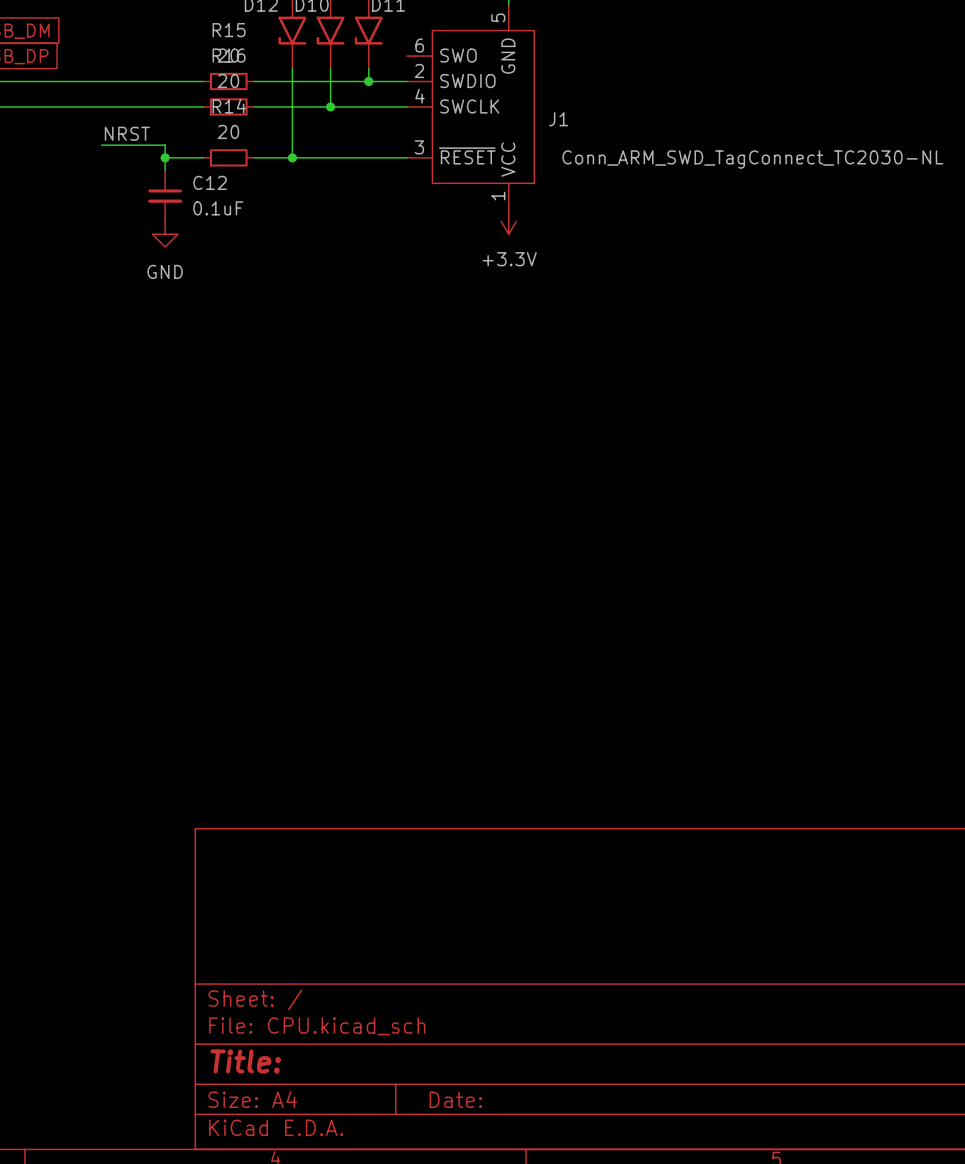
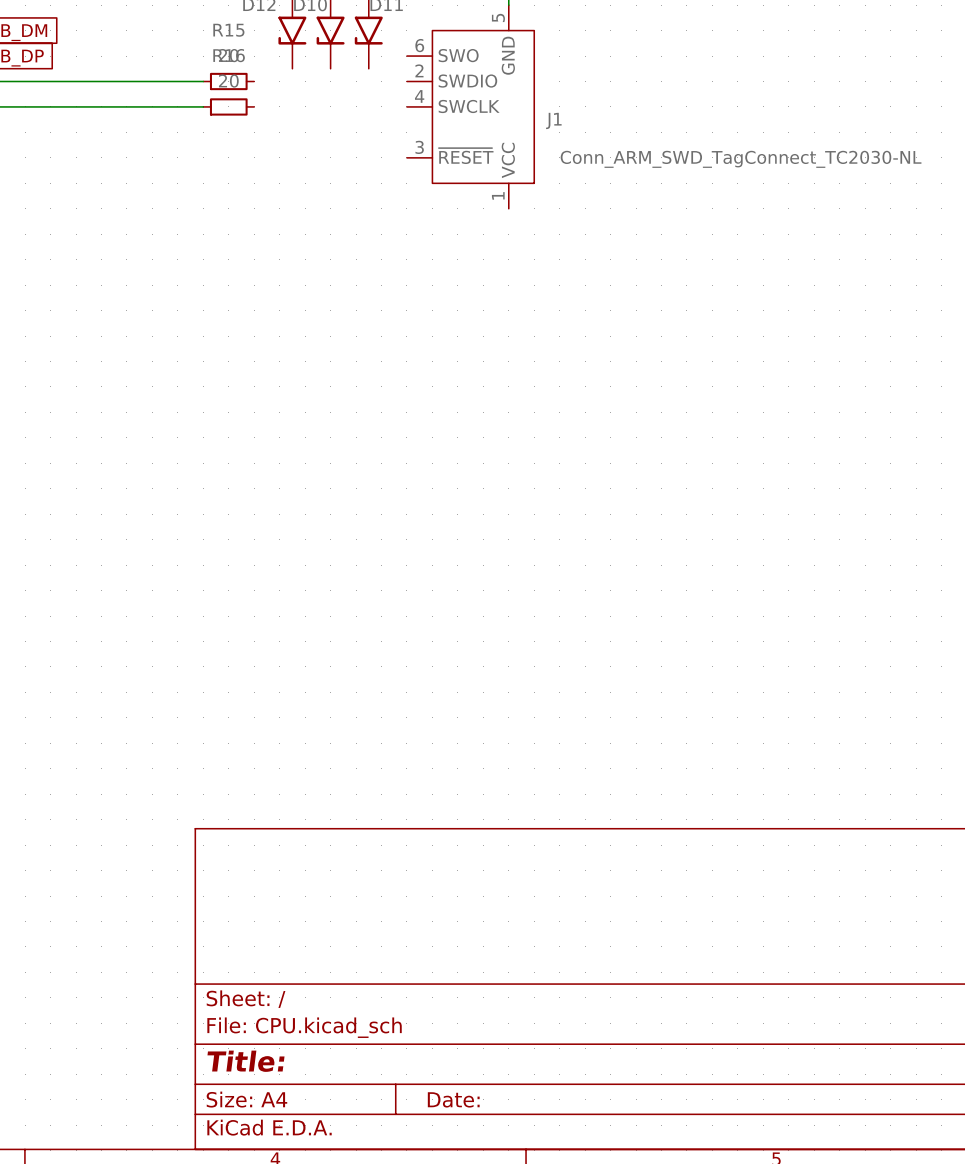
wire: (292, 68) (292, 157) -> none
wire: (330, 68) (330, 106) -> none
wire: (368, 68) (368, 81) -> none
wire: (254, 81) (406, 81) -> none
junction: (368, 81) -> none
wire: (254, 106) (406, 106) -> none
junction: (330, 106) -> none
label: NRST (127, 133) -> none
wire: (101, 145) (165, 145) (165, 170) -> none
wire: (165, 157) (203, 157) -> none
junction: (165, 157) -> none
R14: 20 (228, 157) -> none
wire: (254, 157) (406, 157) -> none
junction: (292, 157) -> none
C12: 0.1uF (165, 196) -> none
power symbol: +3.3V (508, 221) -> none
power symbol: GND (165, 234) -> none

